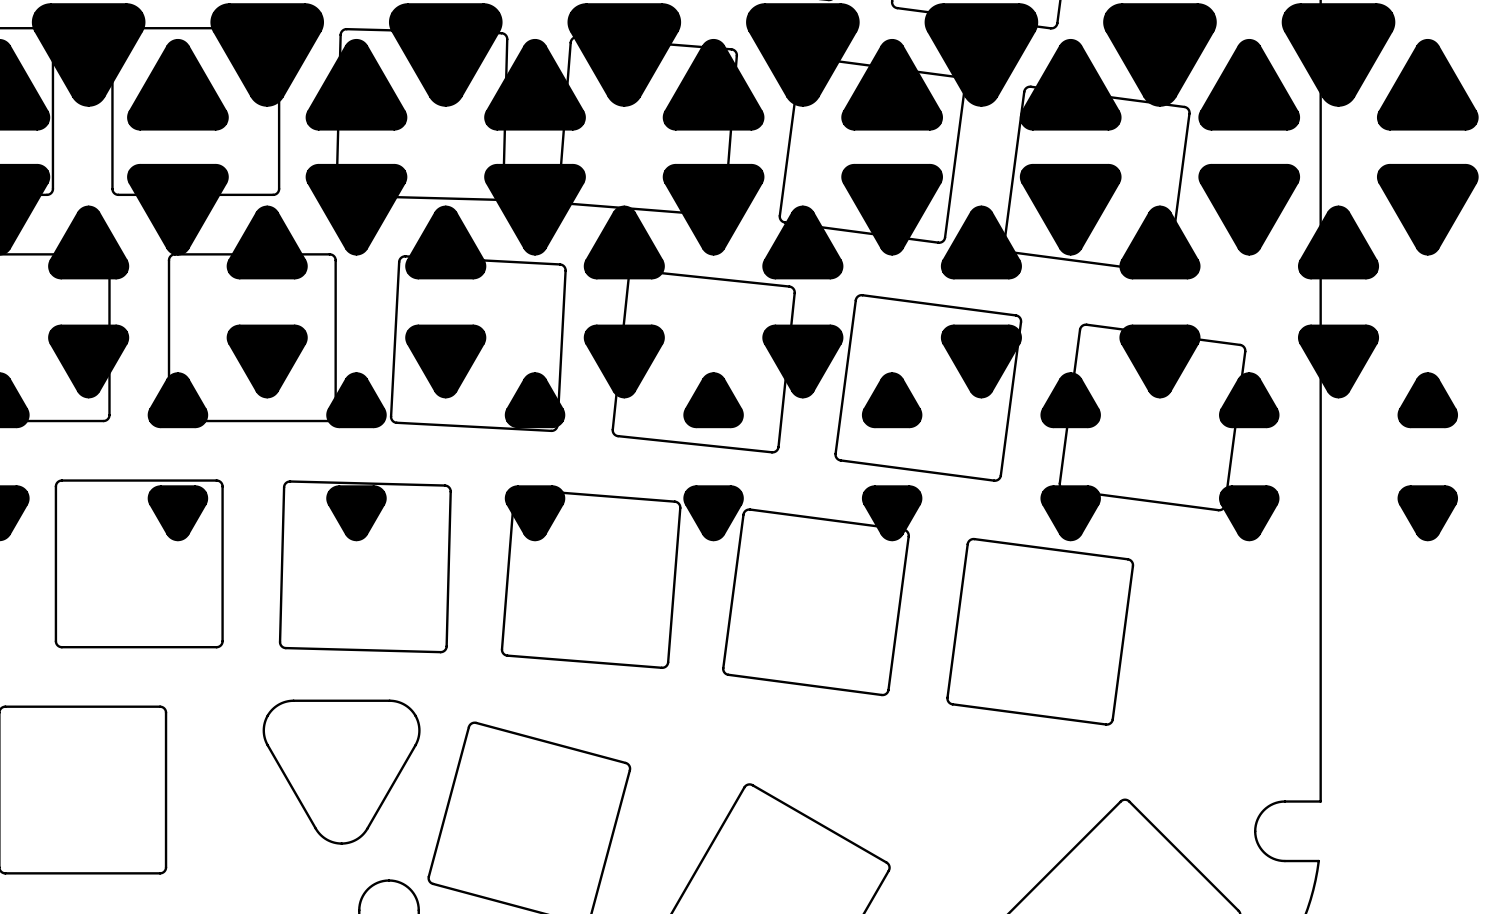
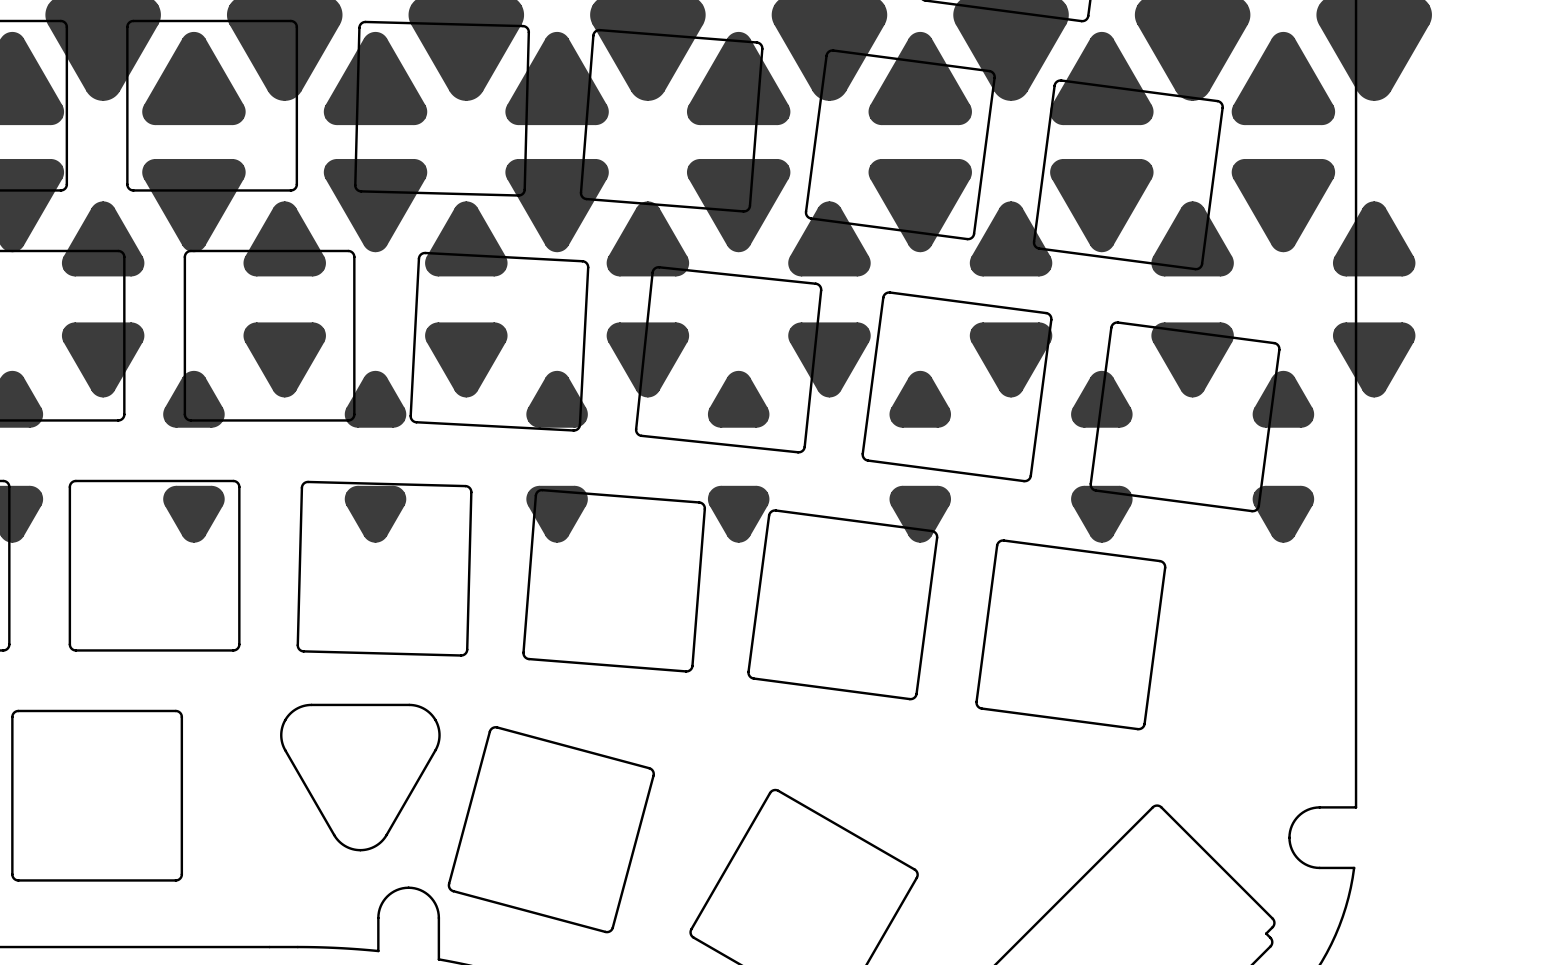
drawing: [1378, 40, 1478, 130] -> none
line: (1427, 40) (1417, 45) (1379, 112) (1378, 121) (1384, 128) (1466, 129) (1472, 127) (1476, 122) (1476, 112) (1438, 46) (1433, 41) (1427, 40) -> none
drawing: [1378, 165, 1478, 255] -> none
line: (1390, 165) (1466, 165) (1472, 167) (1476, 171) (1476, 182) (1438, 248) (1433, 253) (1425, 254) (1418, 249) (1379, 182) (1378, 176) (1380, 170) (1390, 165) -> none
drawing: [1398, 373, 1457, 427] -> none
line: (1427, 373) (1418, 378) (1399, 410) (1399, 419) (1406, 426) (1446, 426) (1452, 424) (1455, 419) (1455, 410) (1438, 379) (1433, 375) (1427, 373) -> none
drawing: [1398, 486, 1457, 541] -> none
line: (1410, 486) (1446, 486) (1452, 488) (1455, 493) (1455, 503) (1437, 534) (1432, 539) (1425, 539) (1418, 535) (1399, 502) (1400, 491) (1410, 486) -> none

